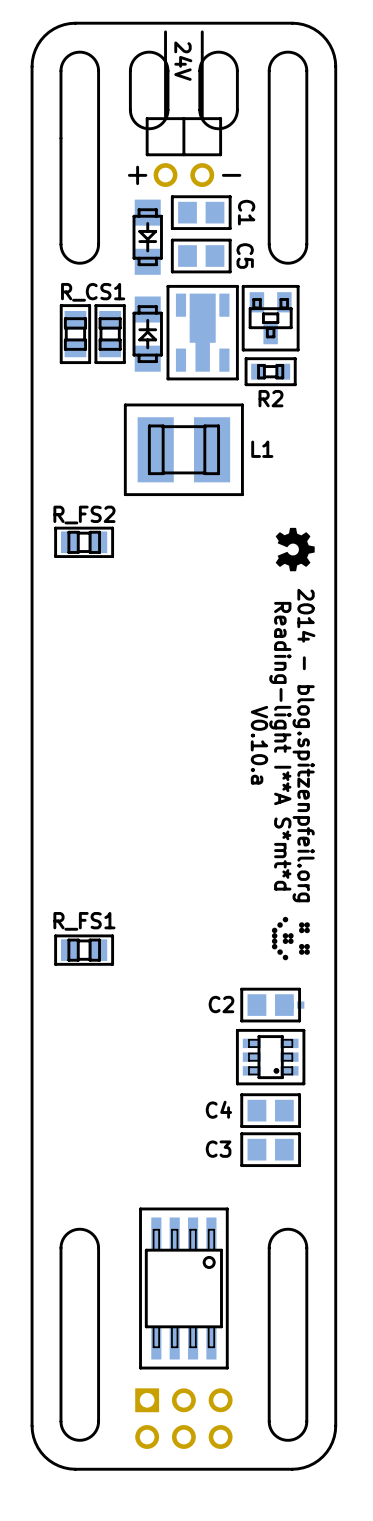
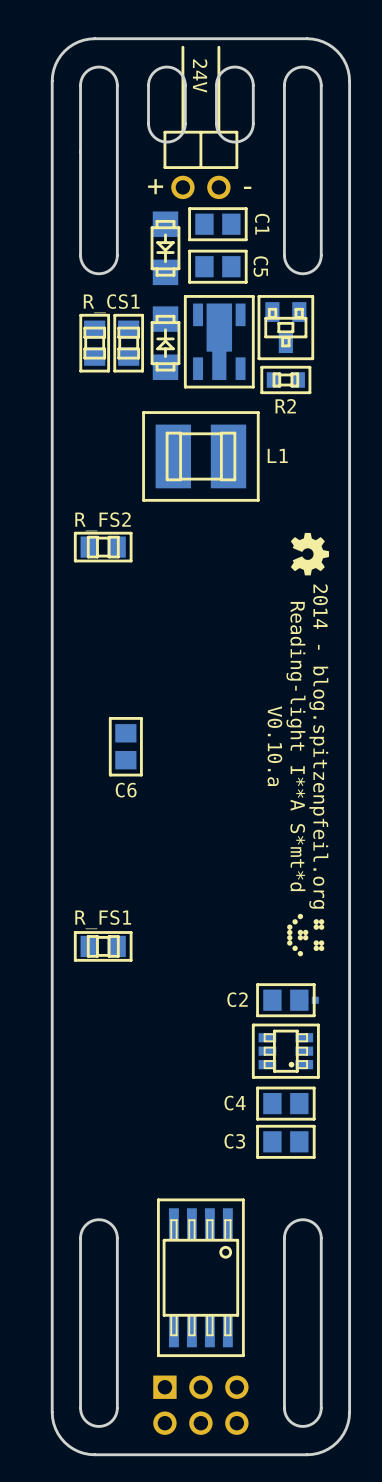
C6: none -> (125, 746)

